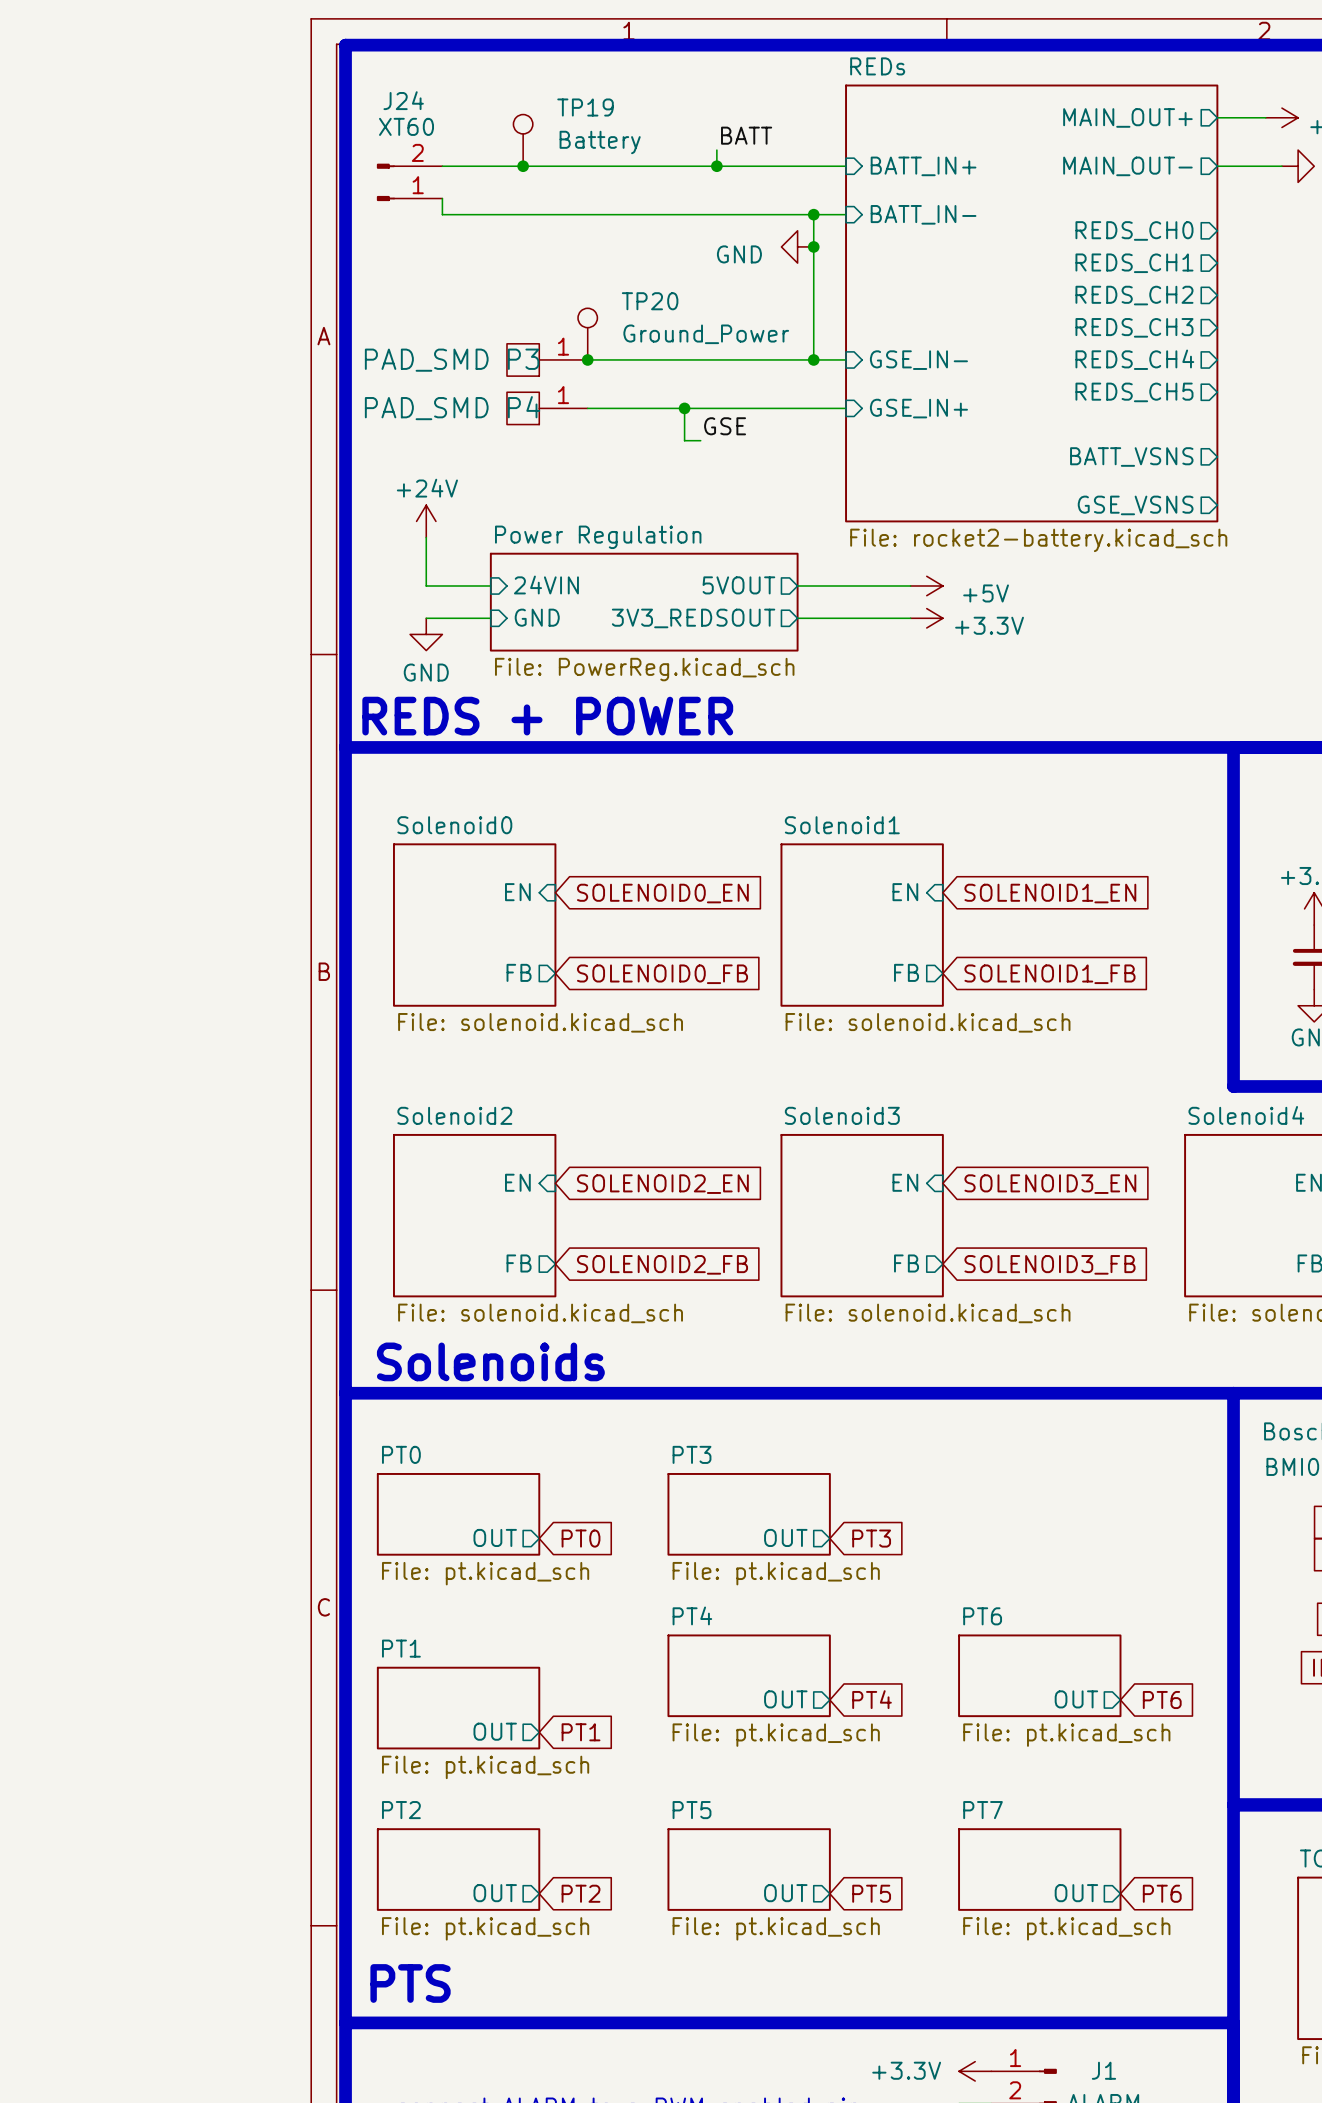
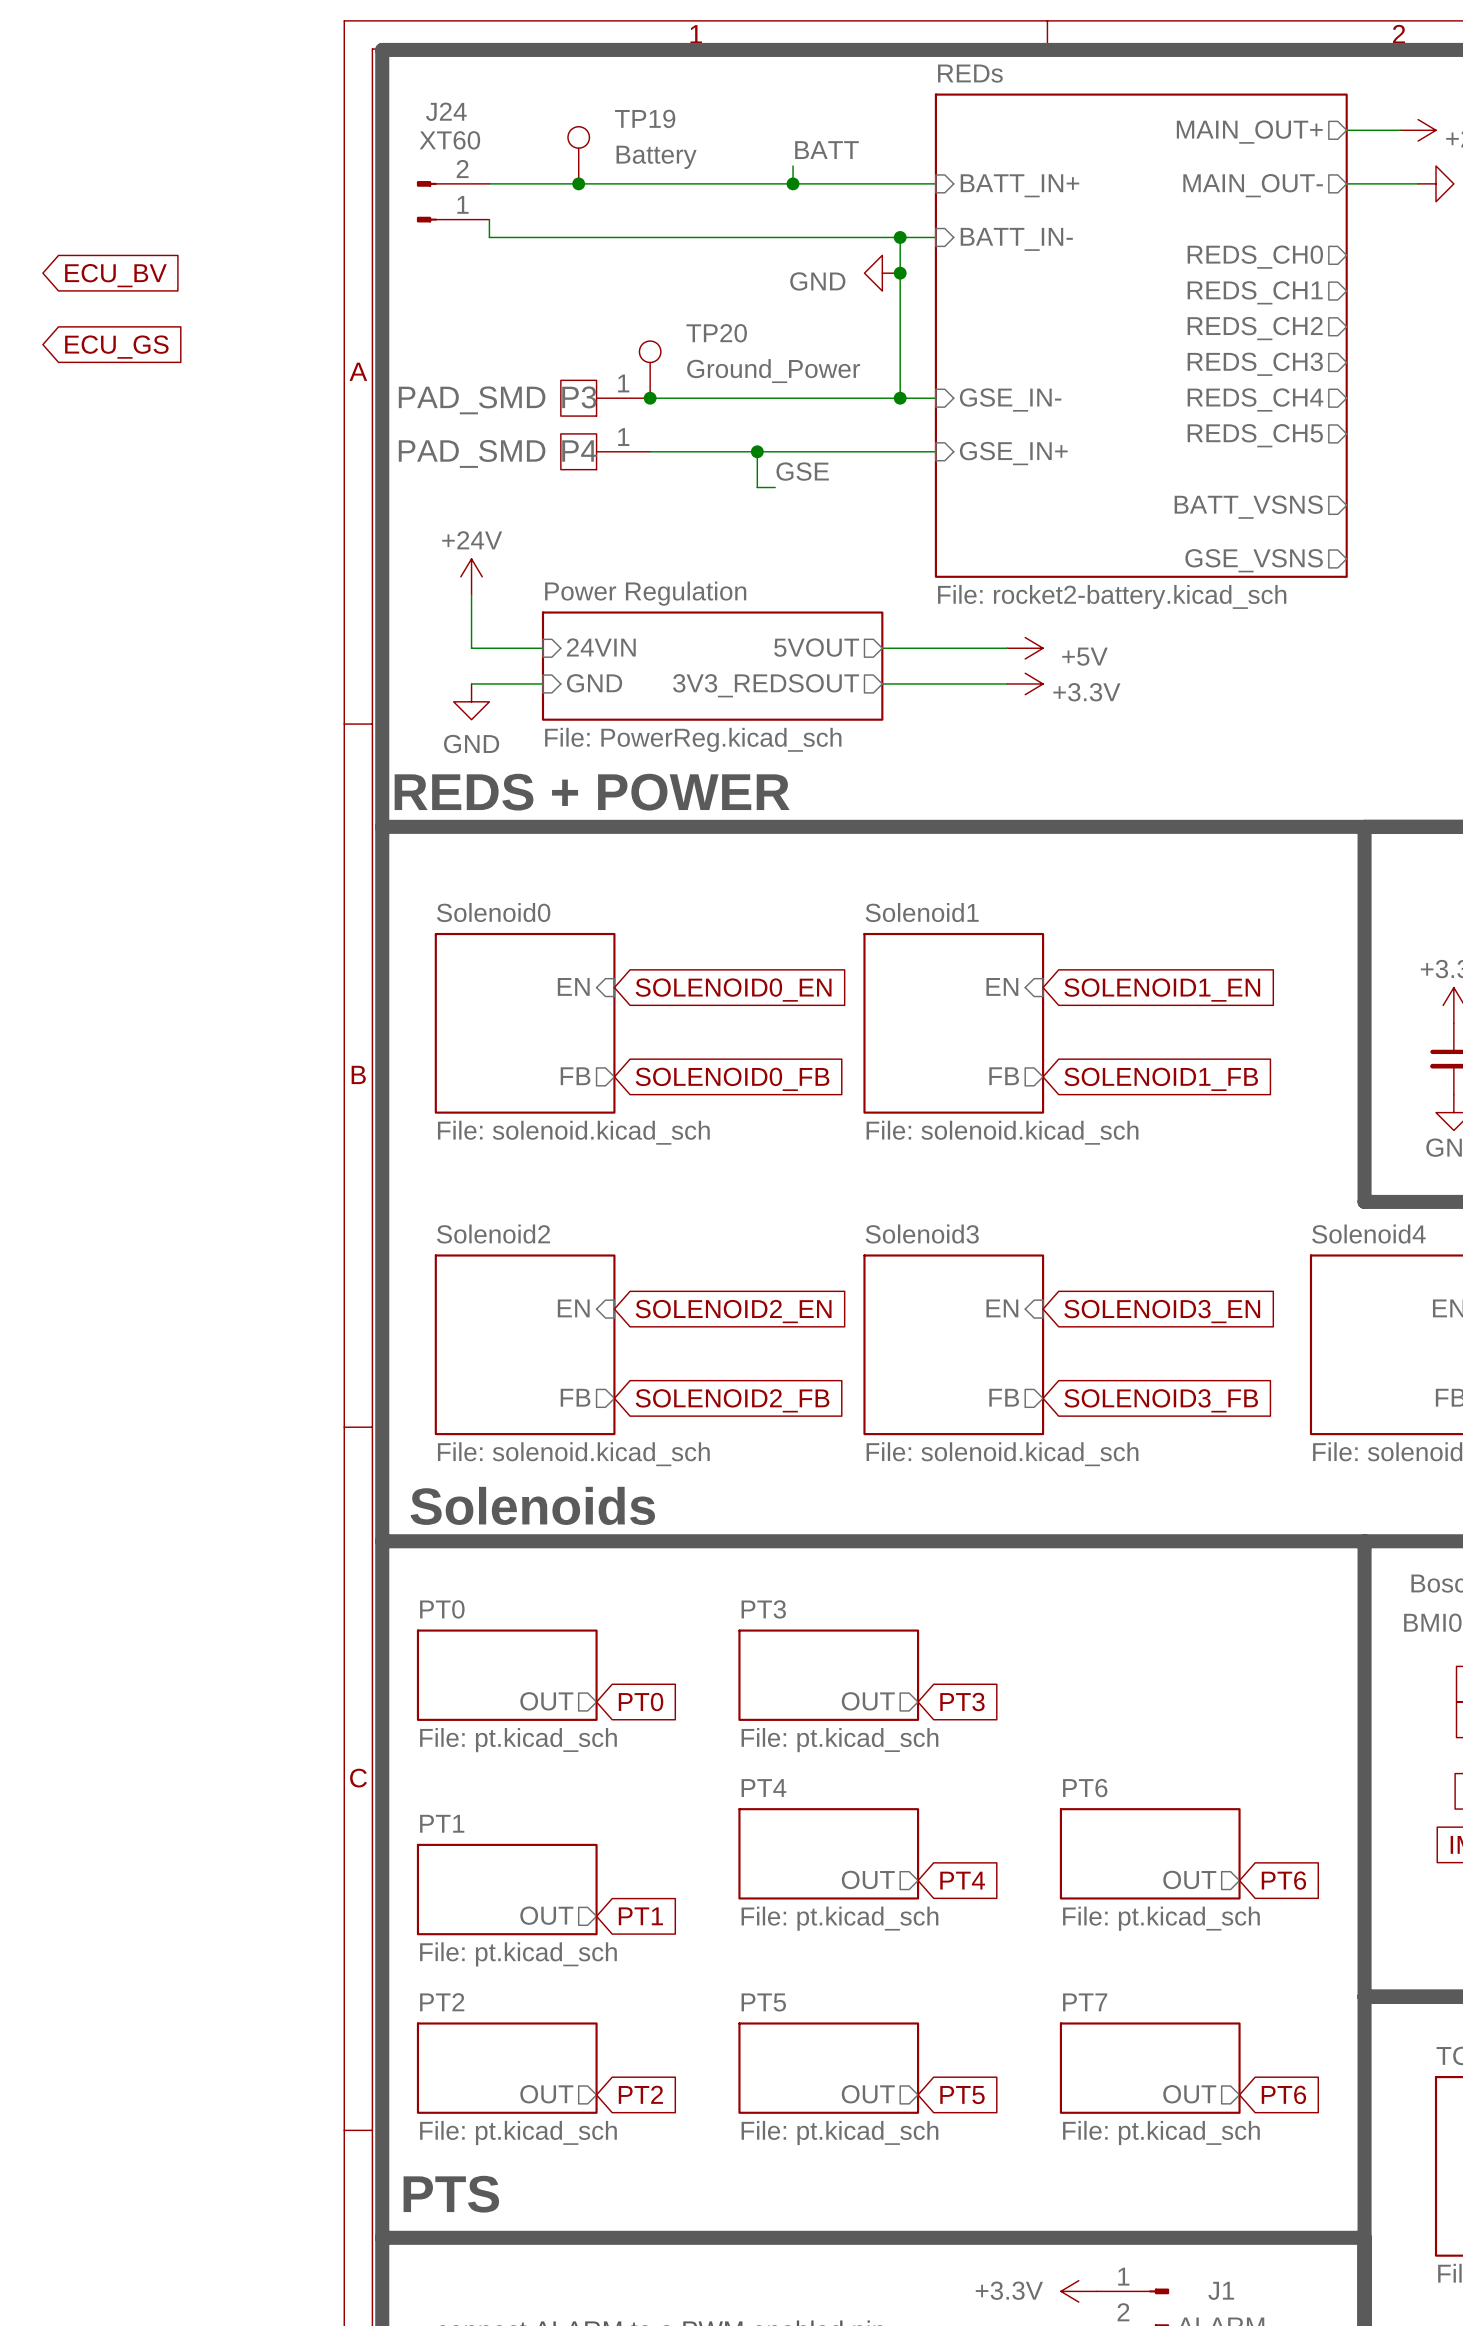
global label: none -> ECU_BV (115, 275)
global label: none -> ECU_GS (116, 347)

